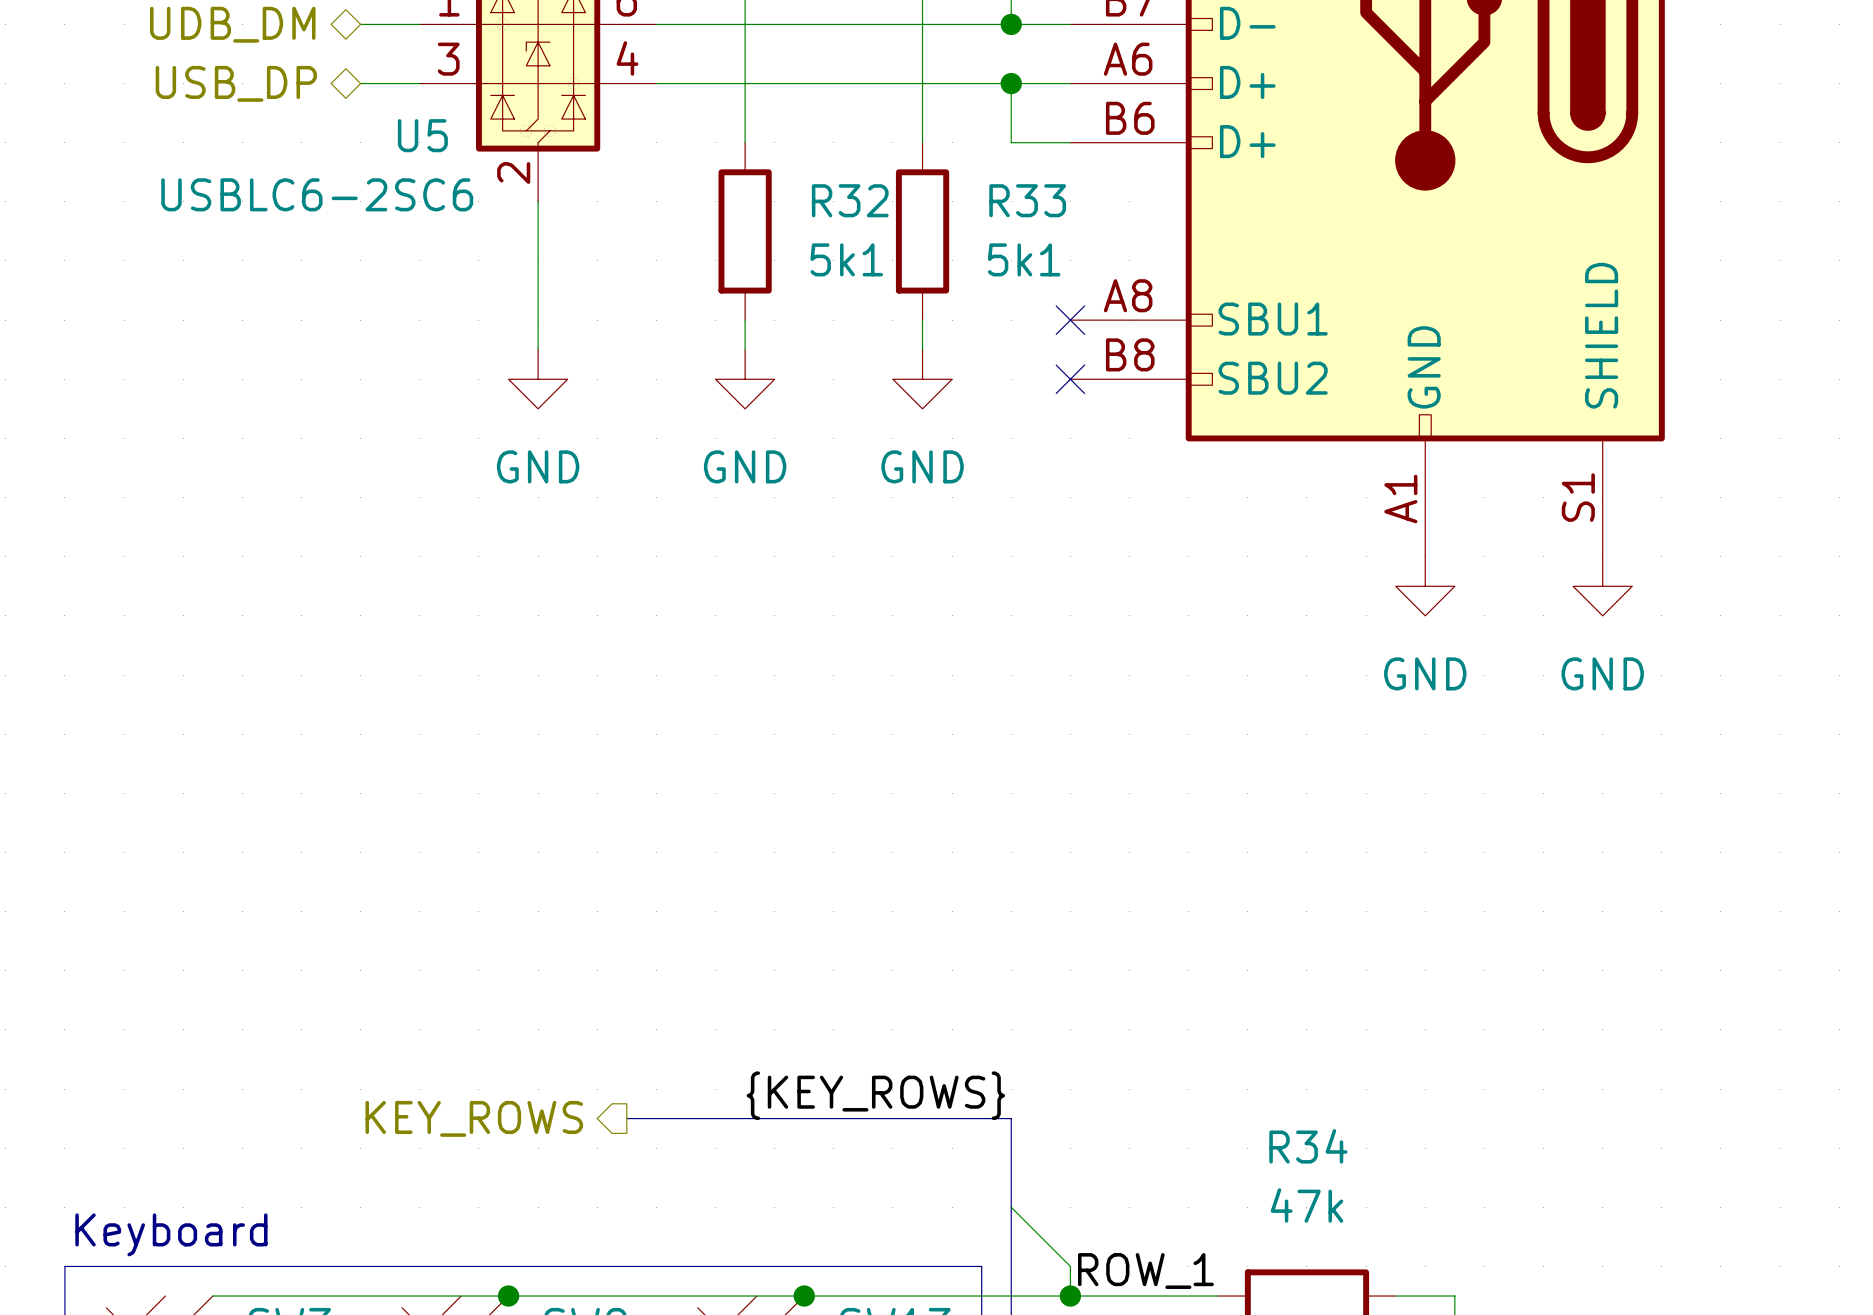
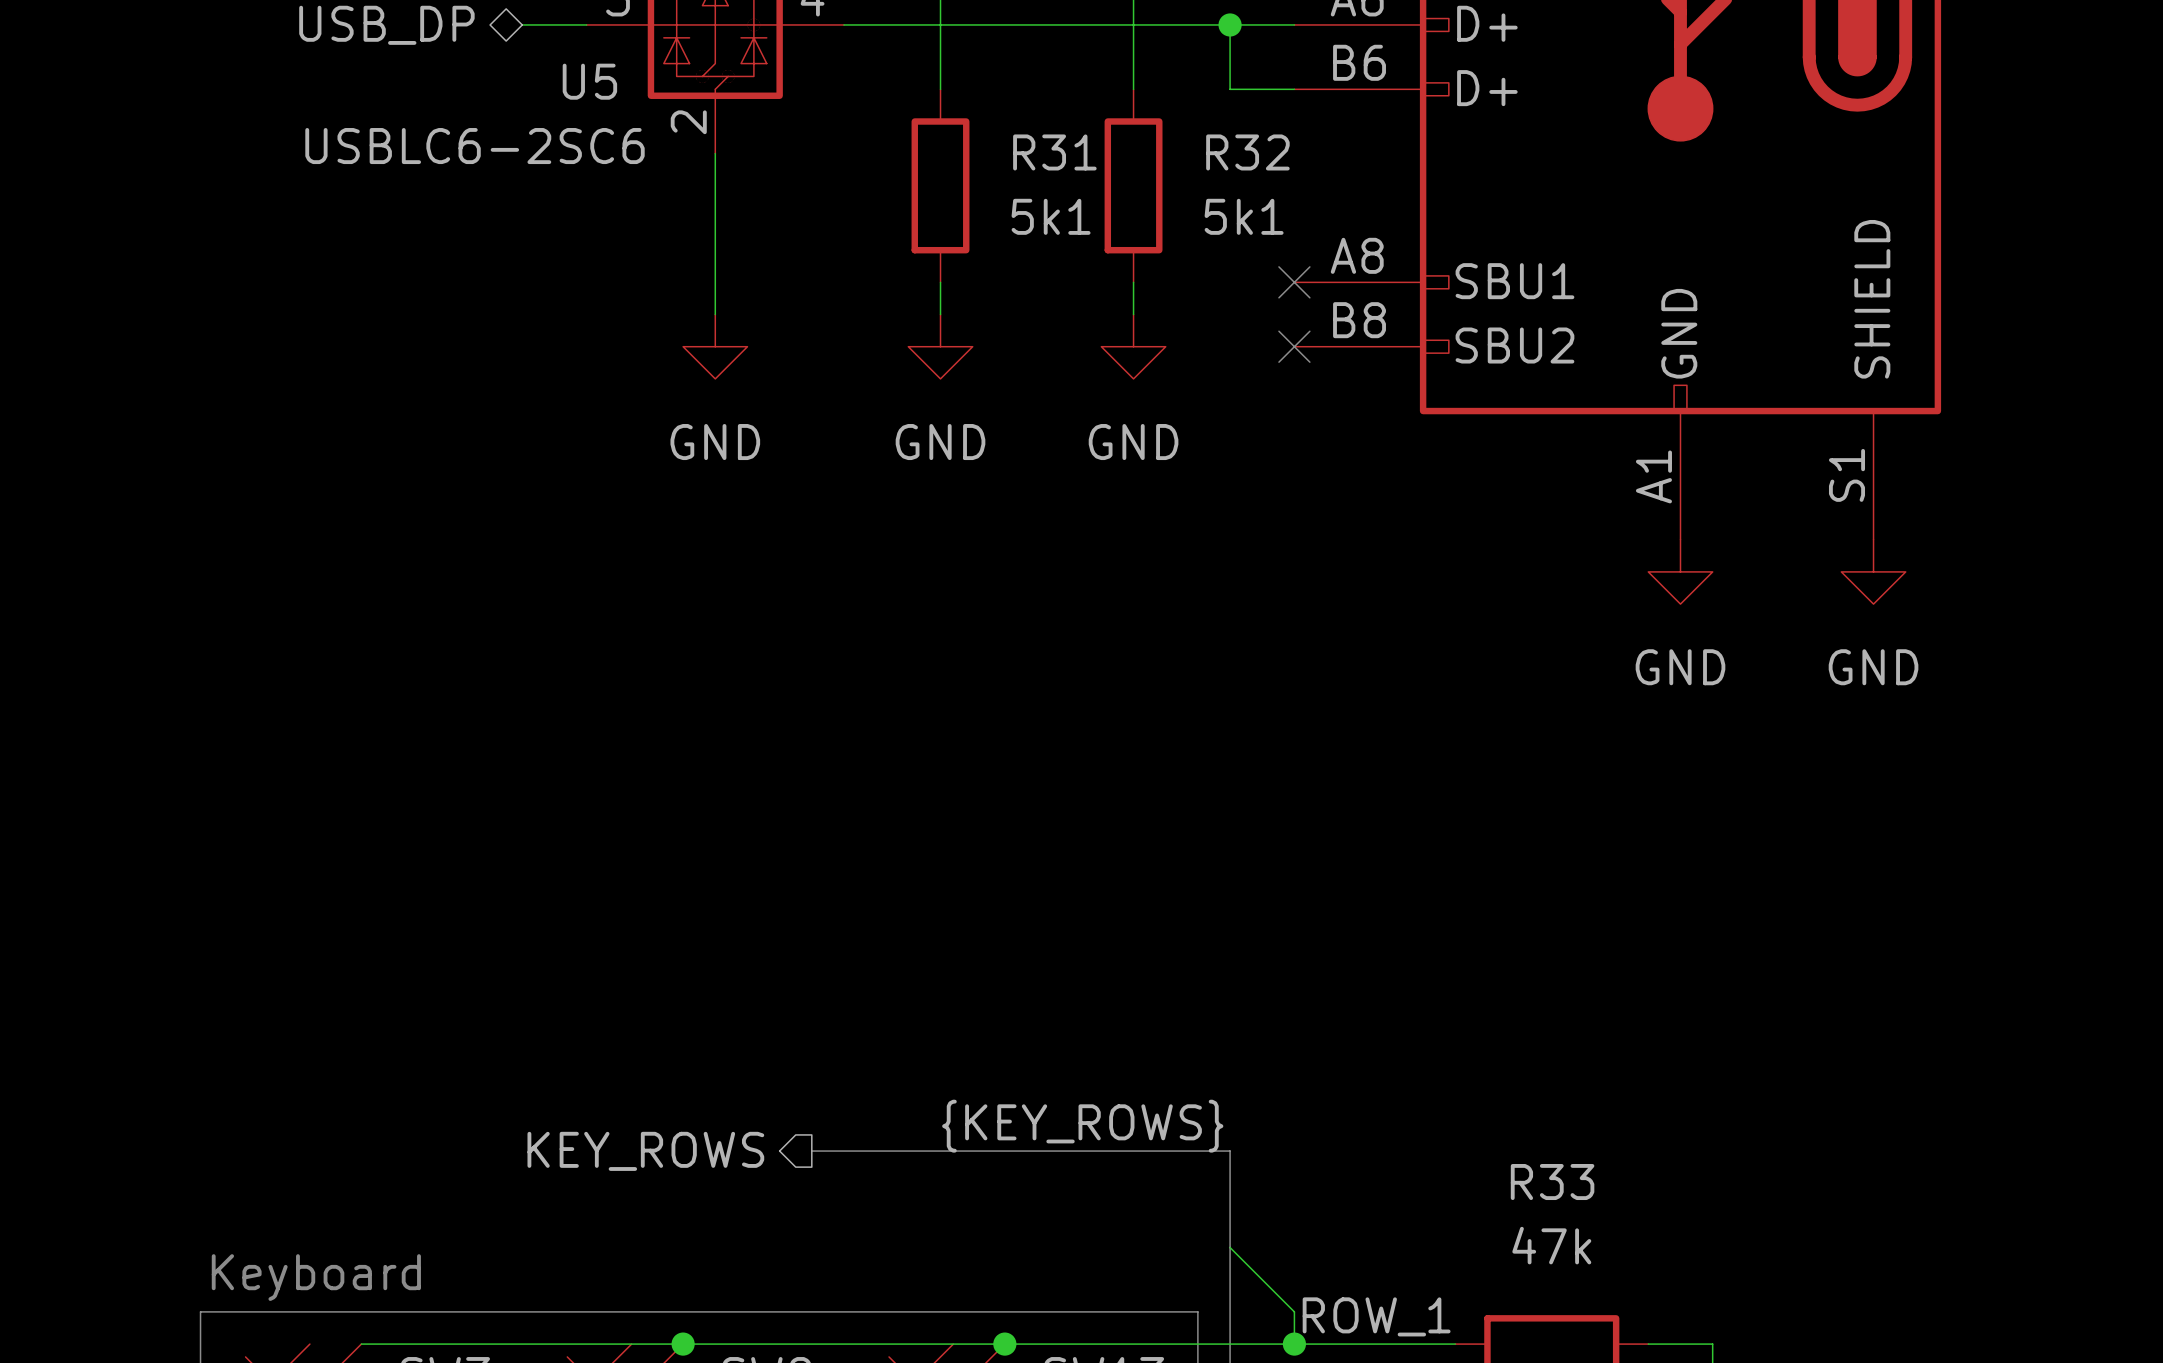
R32 name: R32 (850, 200) -> R31 (1054, 152)
R33 name: R33 (1027, 200) -> R32 (1247, 152)
R34 name: R34 (1308, 1146) -> R33 (1552, 1182)

